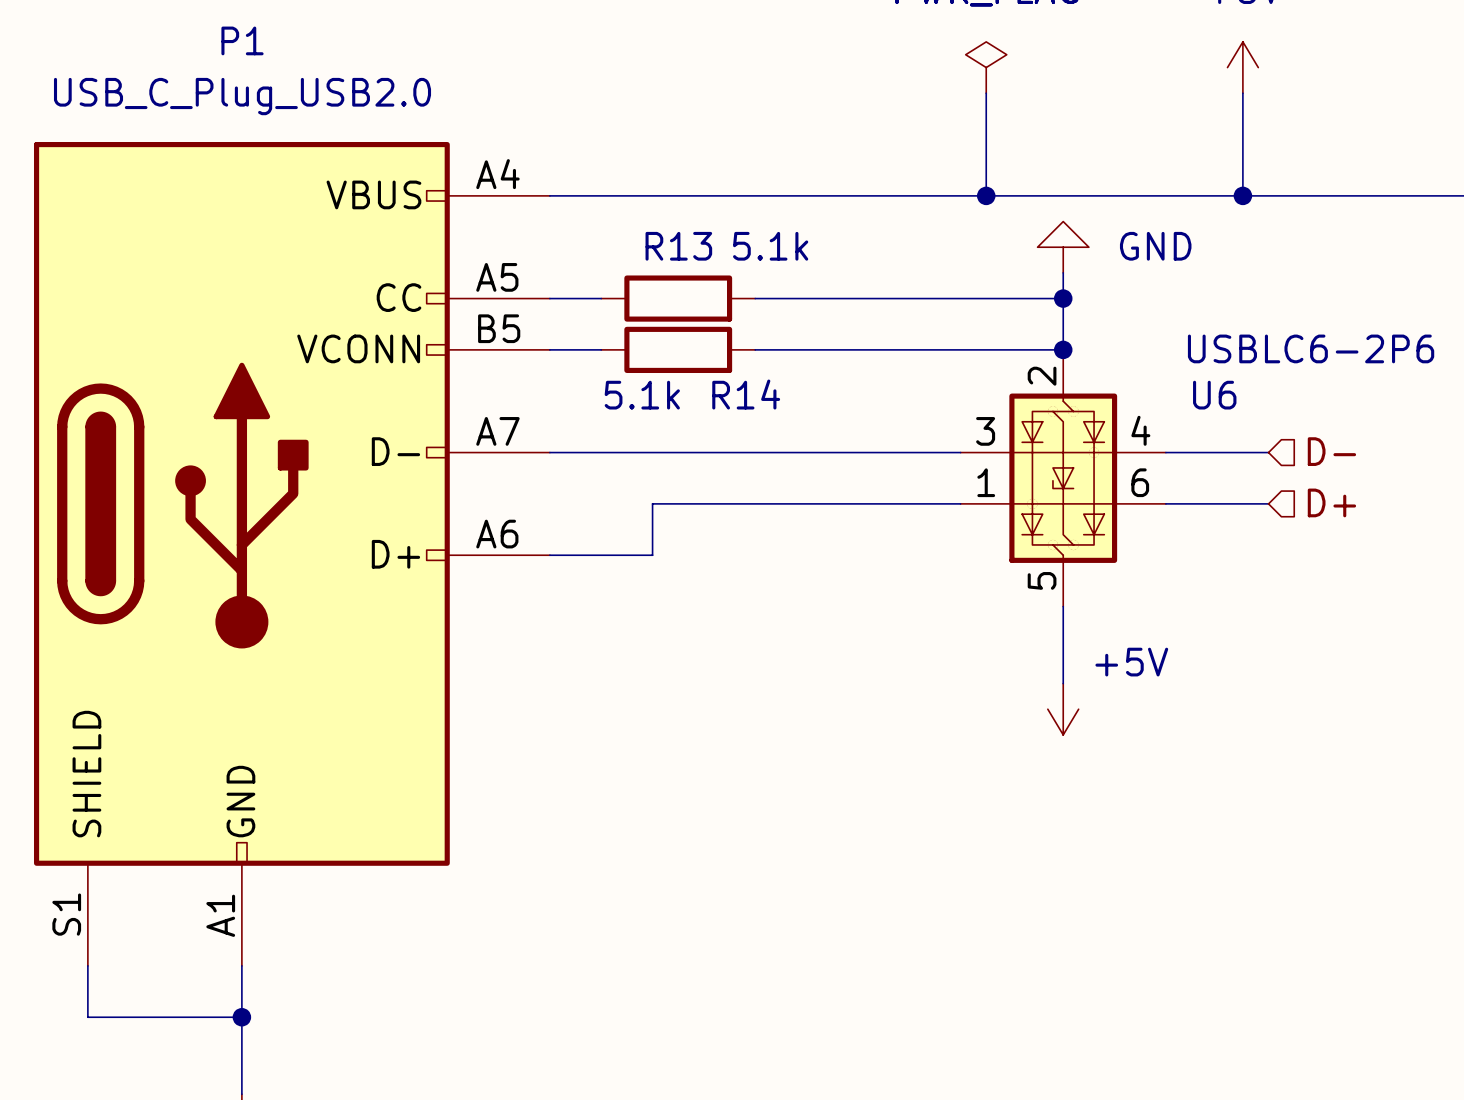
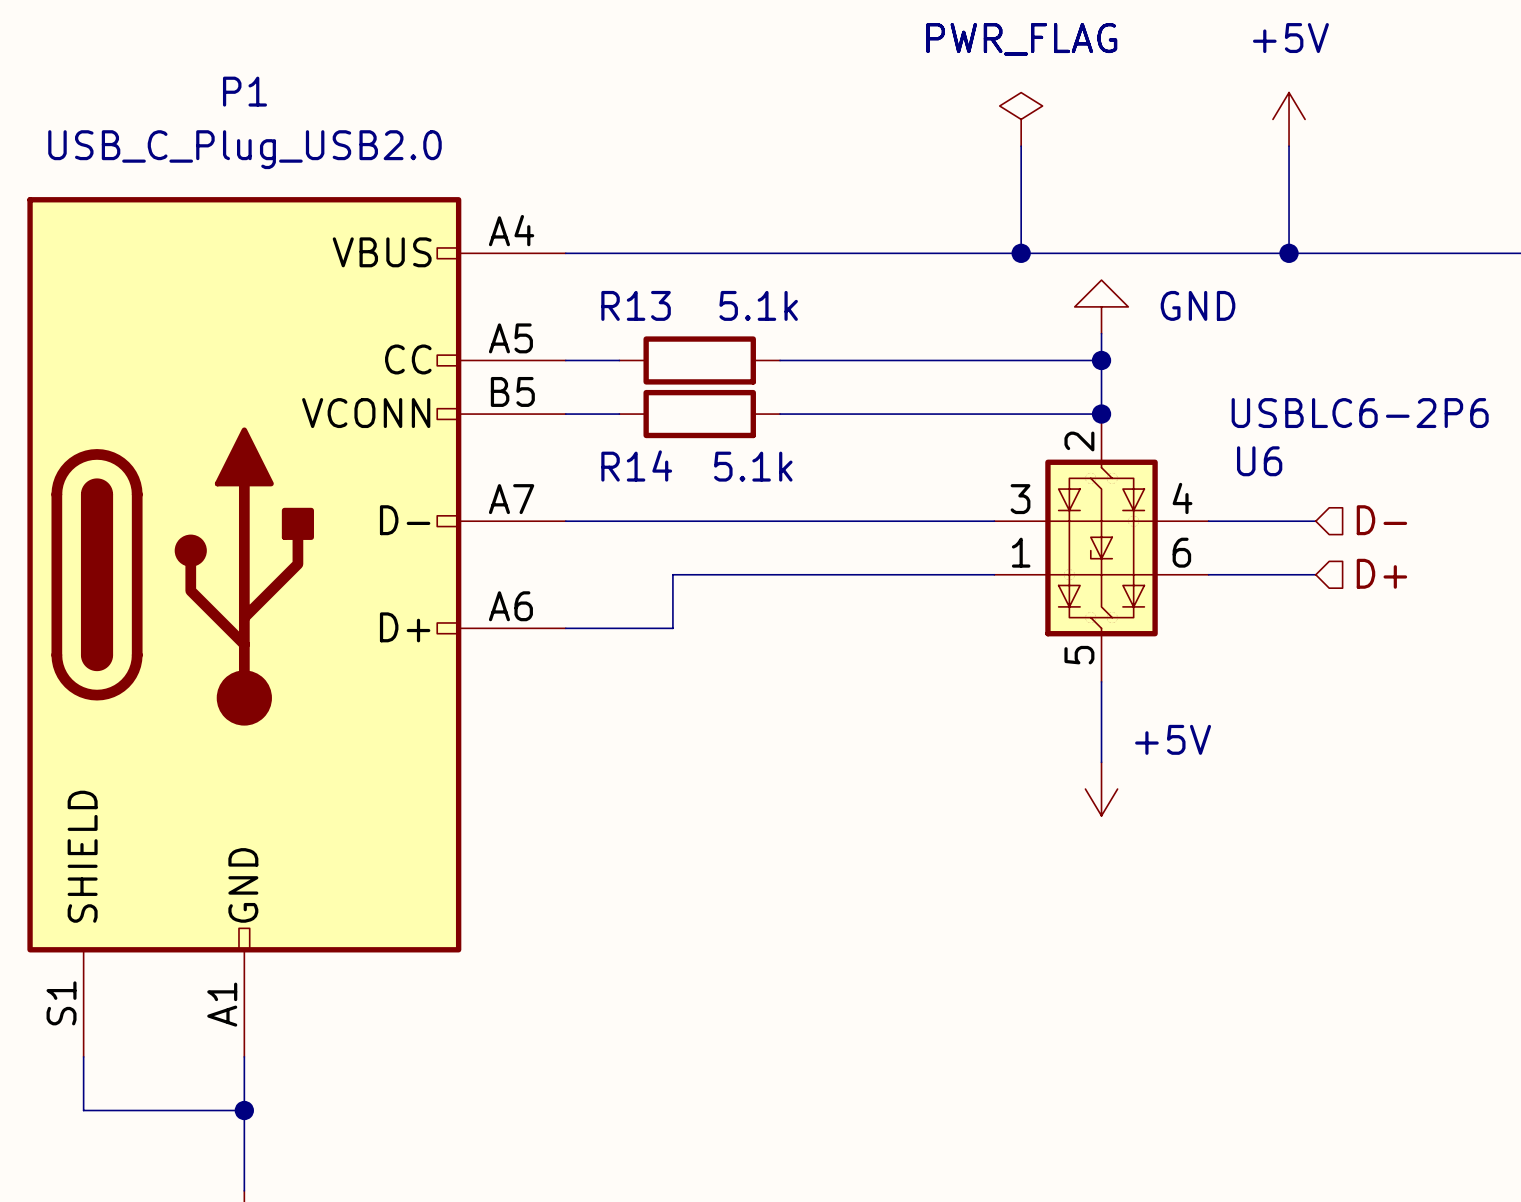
R13 name position: R13 (678, 246) -> R13 (636, 305)
R13 value position: 5.1k (770, 246) -> 5.1k (758, 305)
R14 name position: R14 (746, 394) -> R14 (636, 465)
R14 value position: 5.1k (642, 395) -> 5.1k (753, 466)

